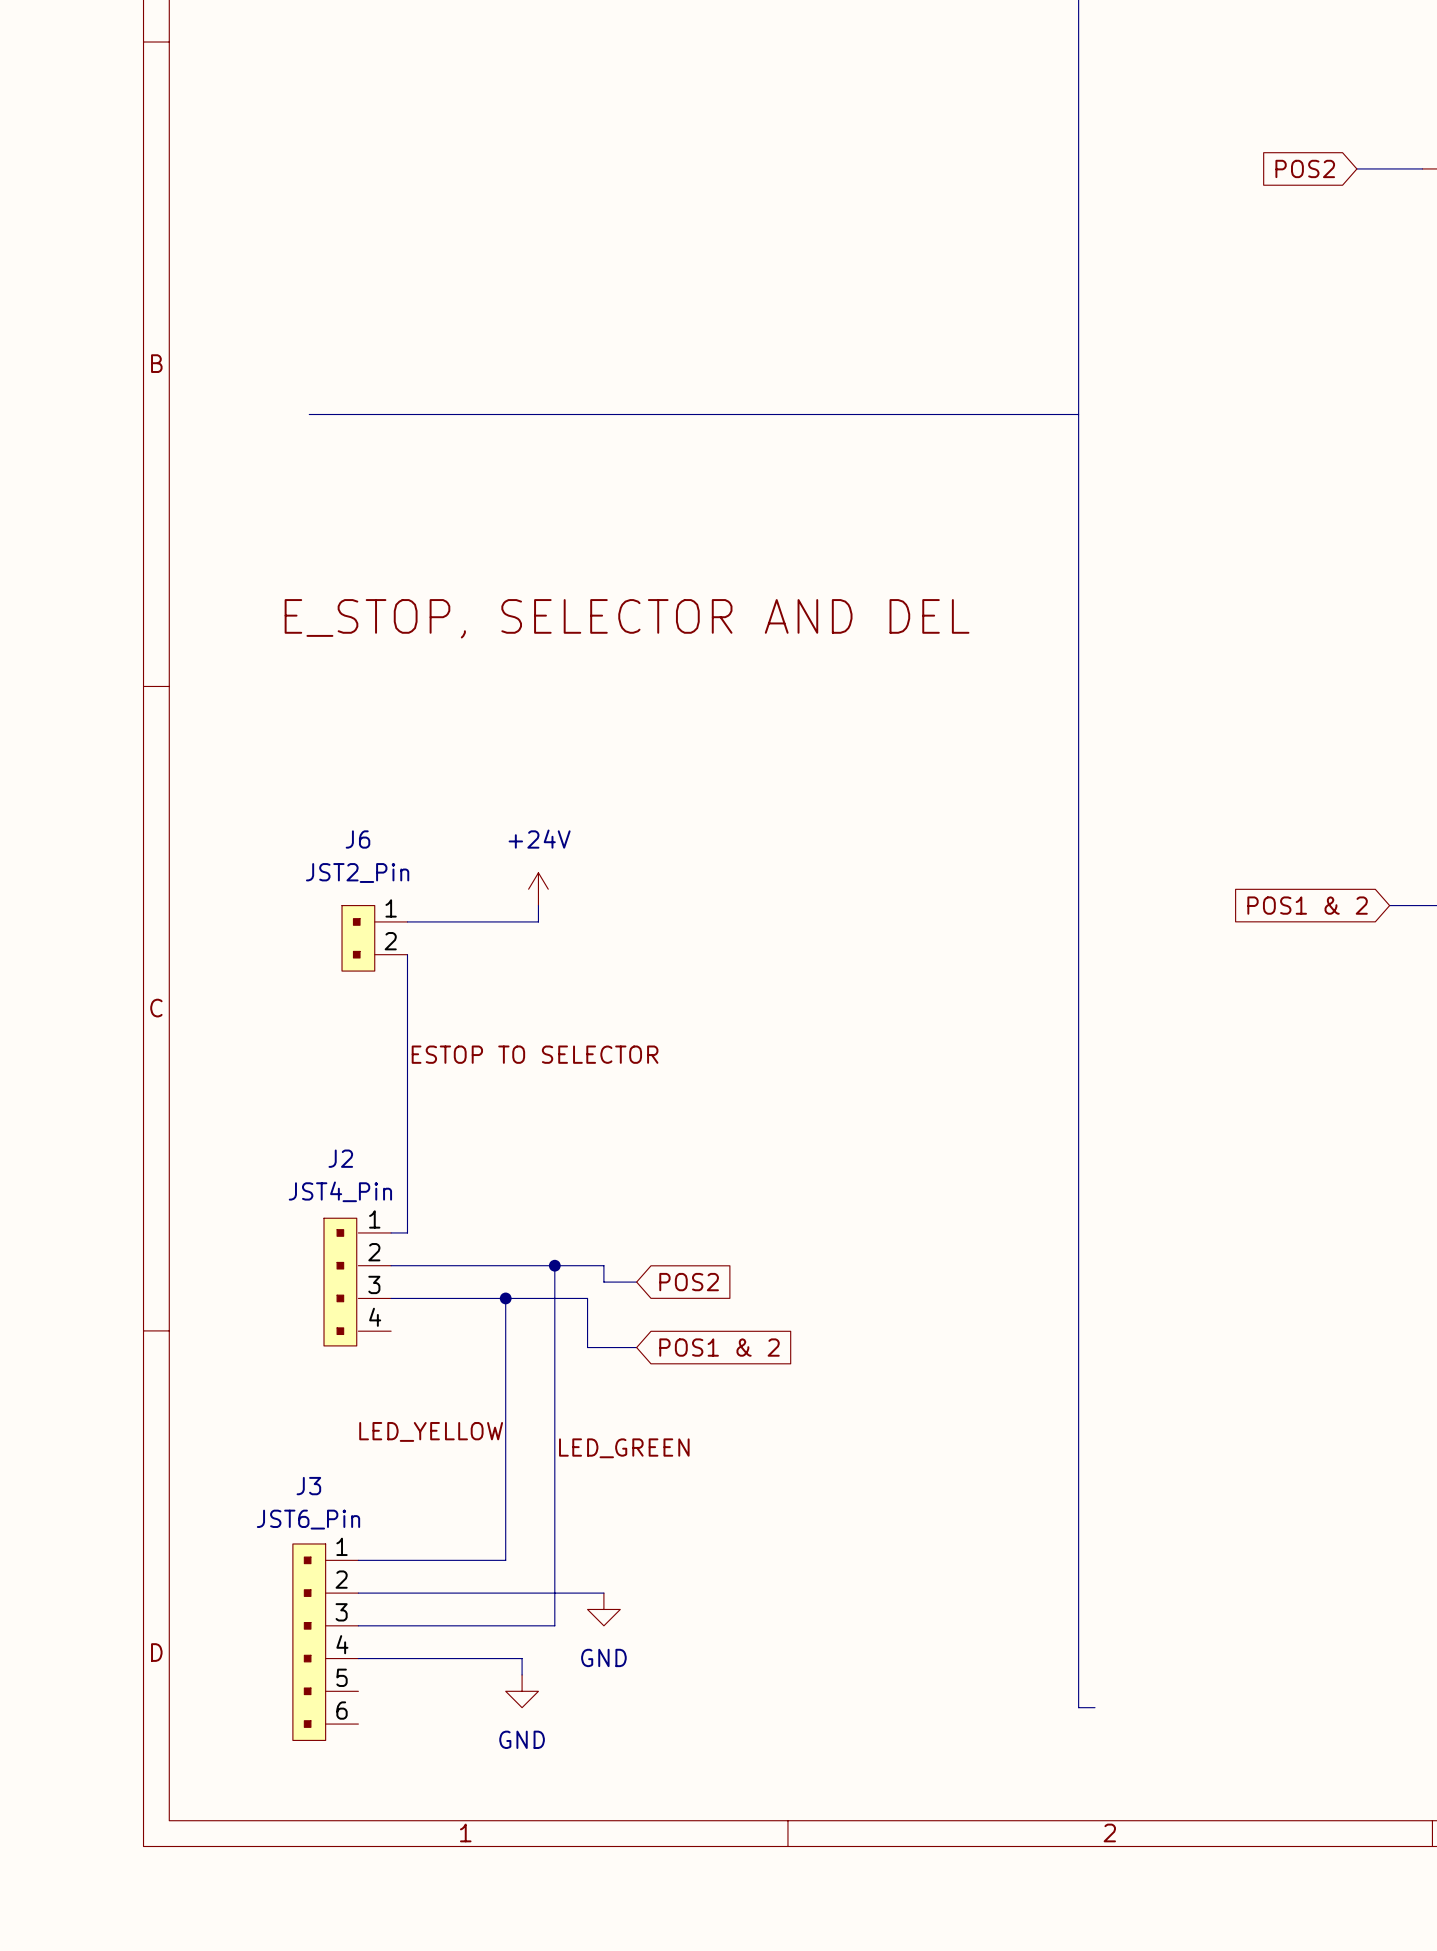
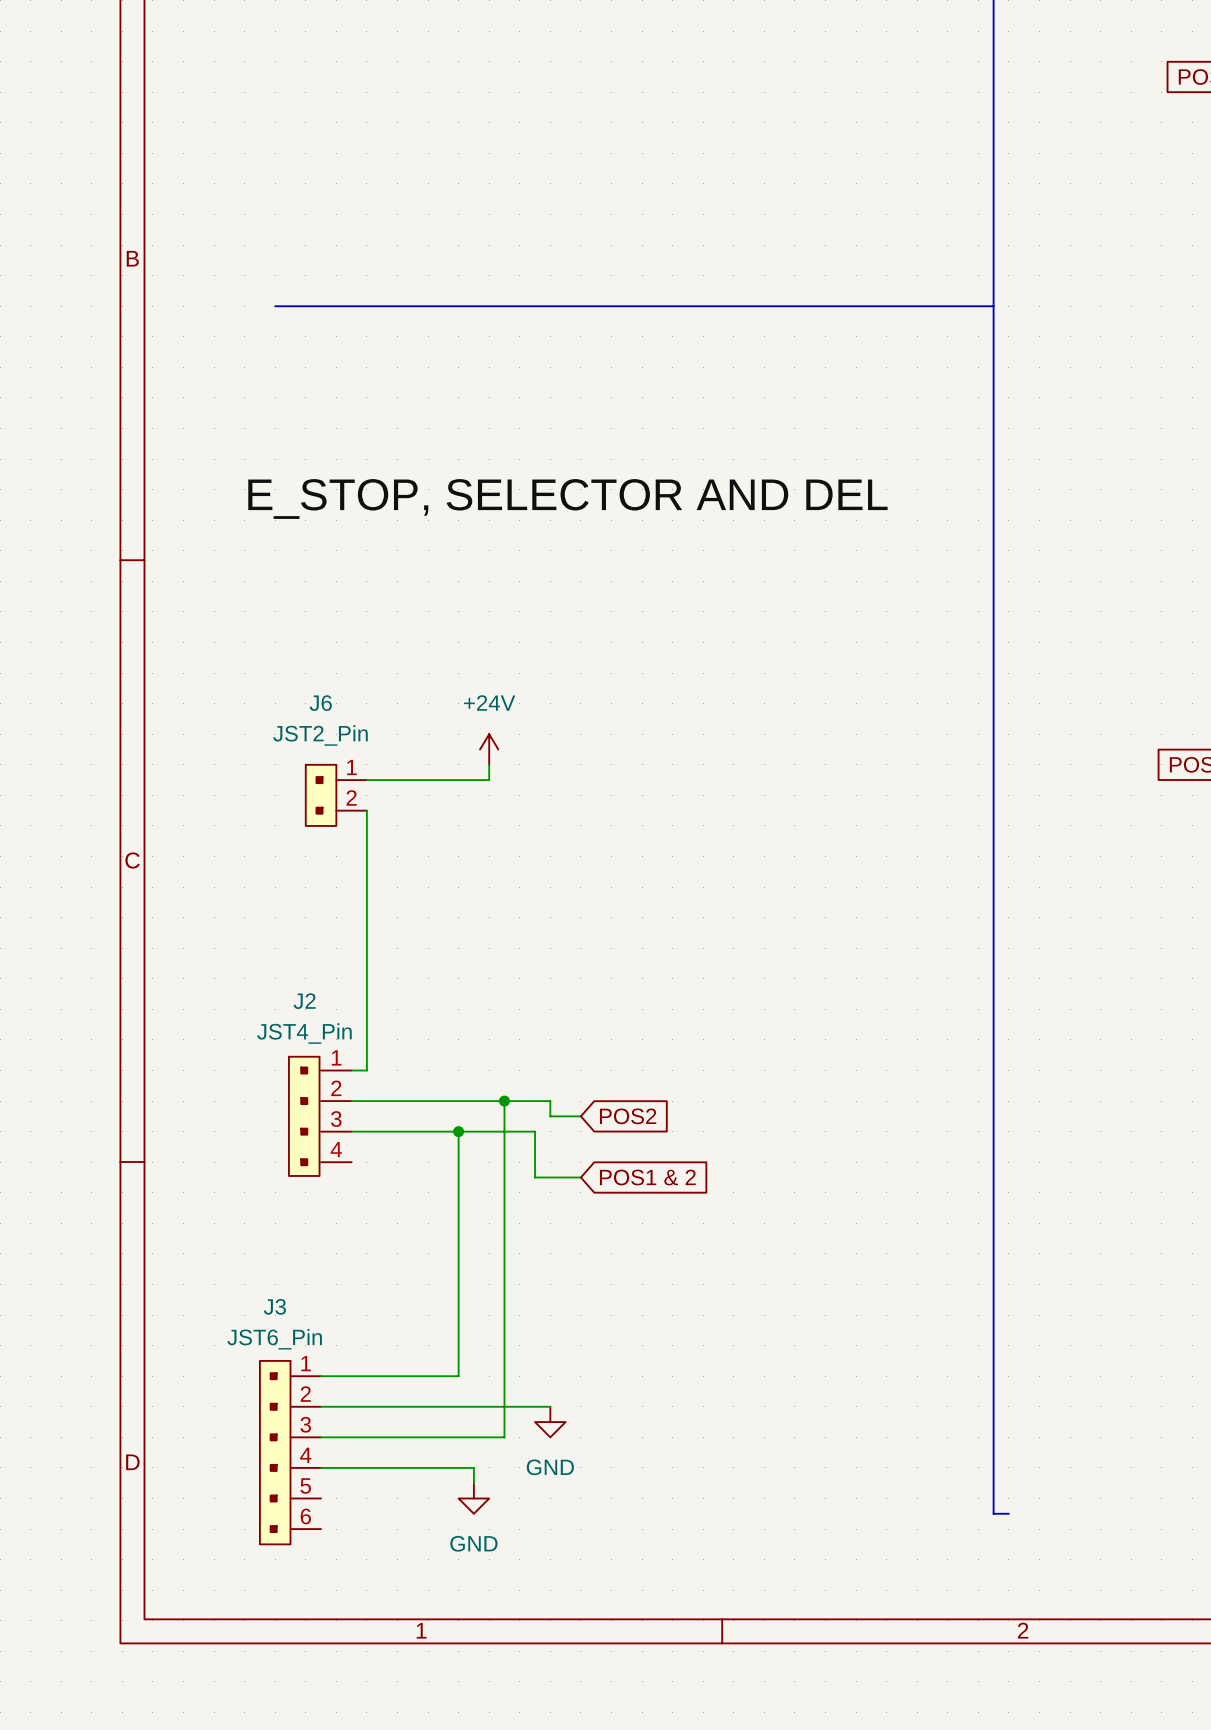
label: ESTOP TO SELECTOR (535, 1054) -> none
label: LED_YELLOW (431, 1431) -> none
label: LED_GREEN (624, 1448) -> none

